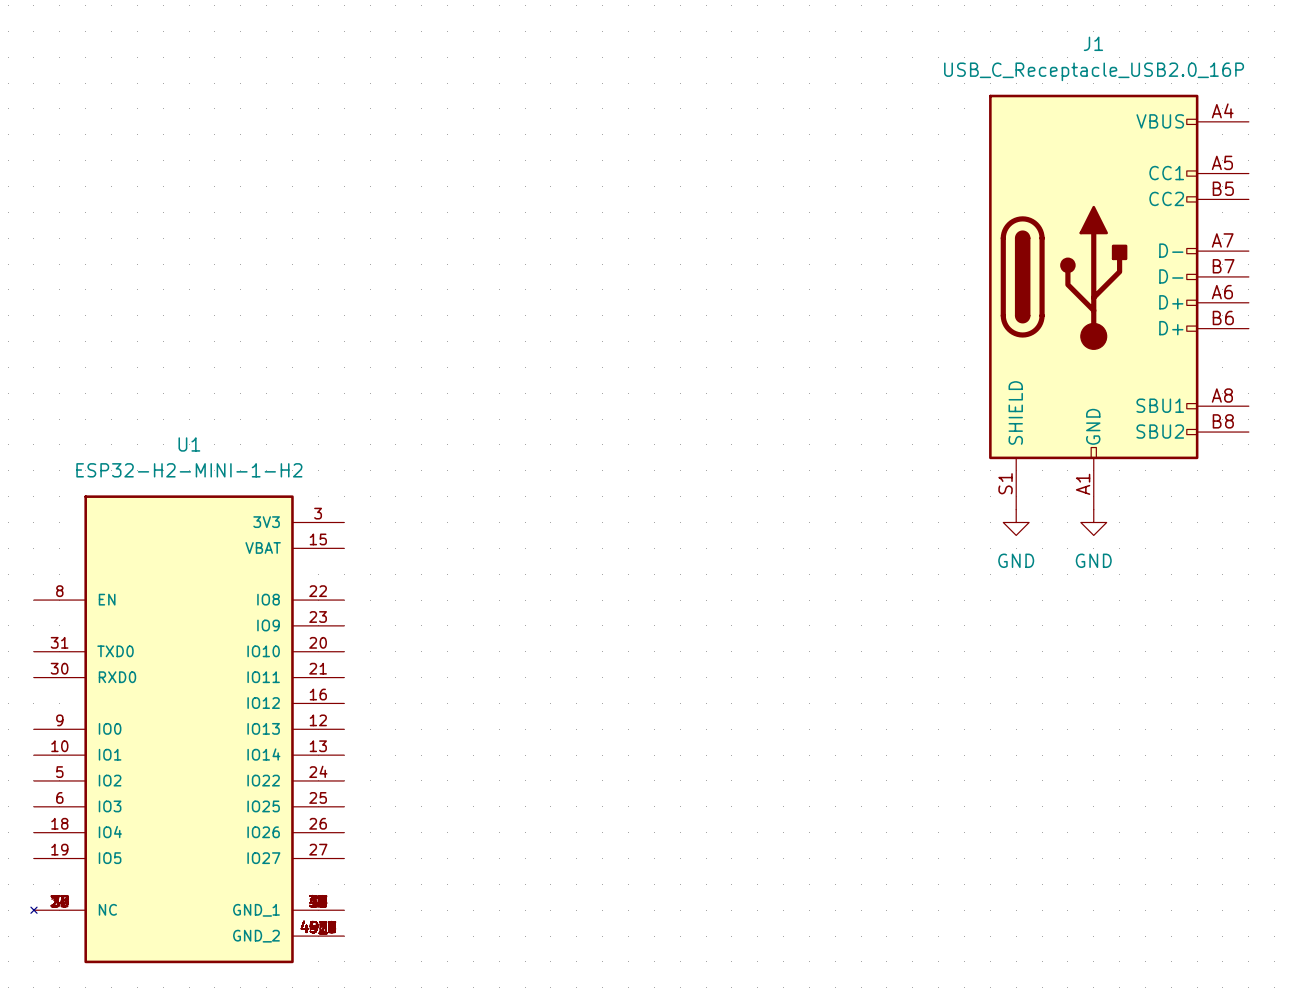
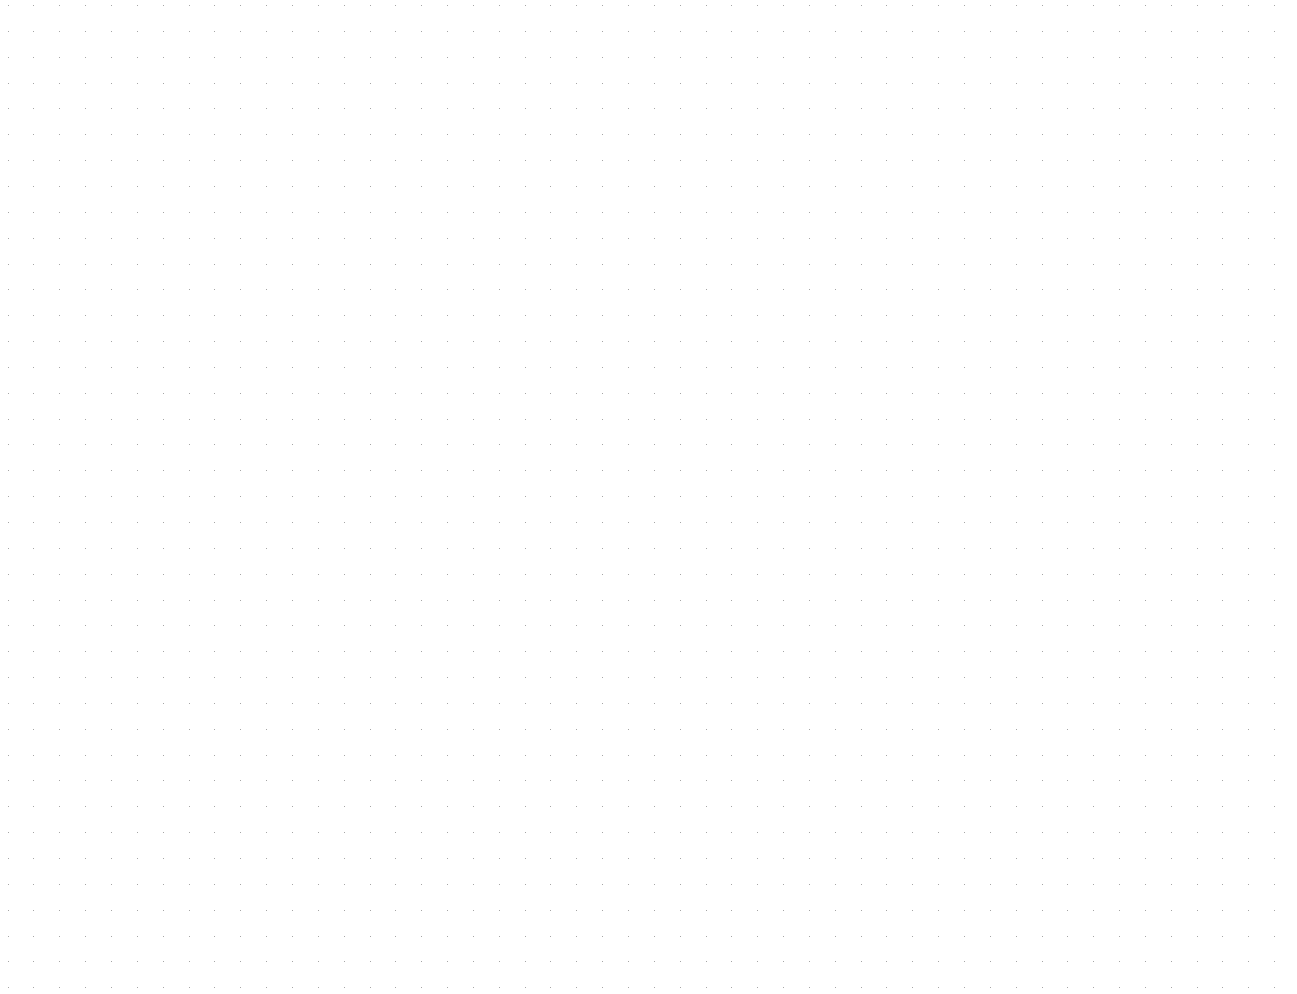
J1: USB_C_Receptacle_USB2.0_16P (1118, 302) -> none
power symbol: GND (1016, 522) -> none
power symbol: GND (1093, 522) -> none
U1: ESP32-H2-MINI-1-H2 (187, 729) -> none

